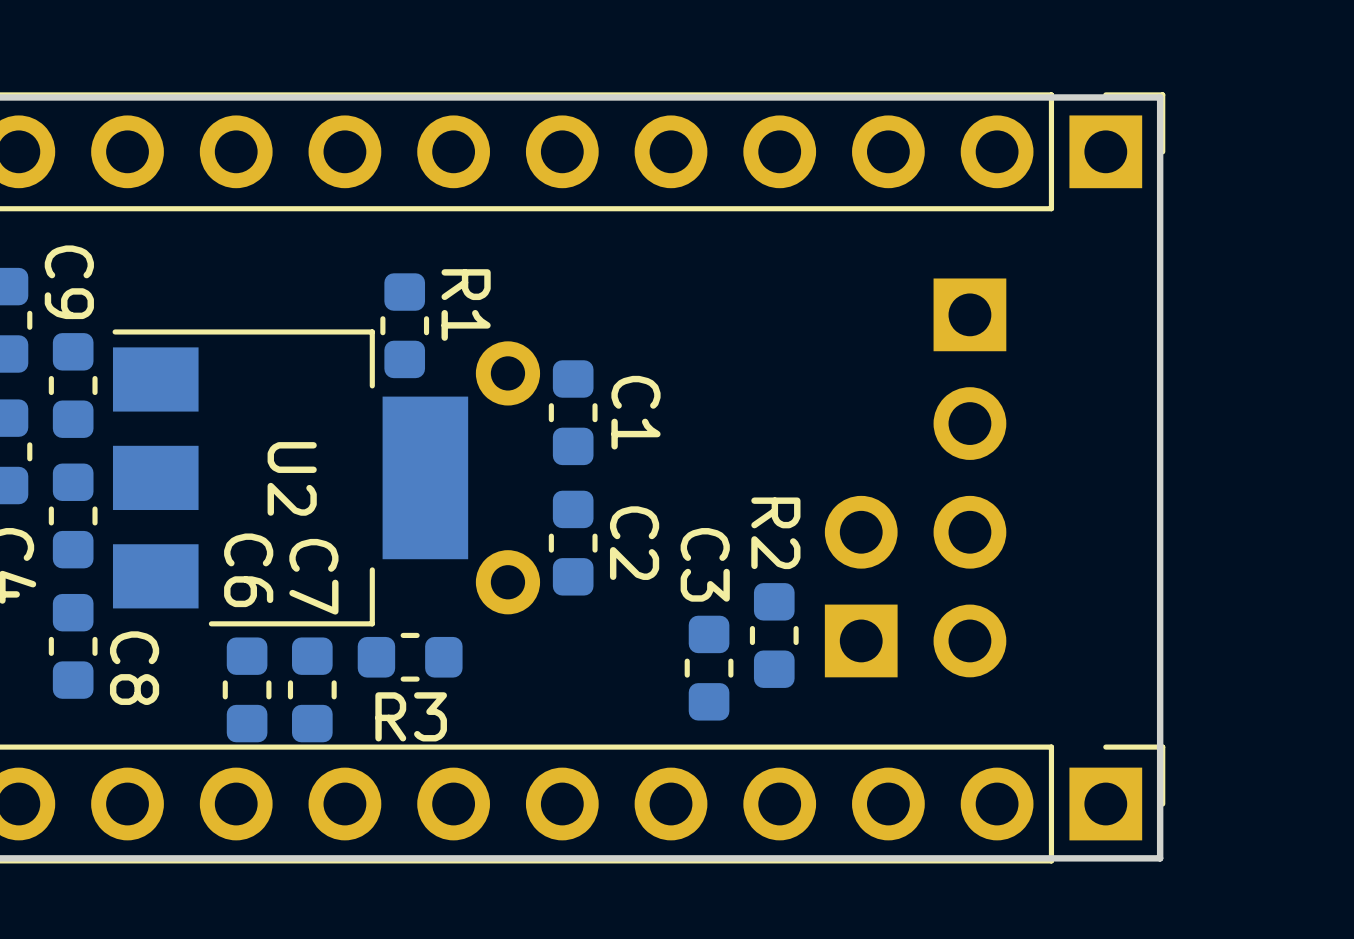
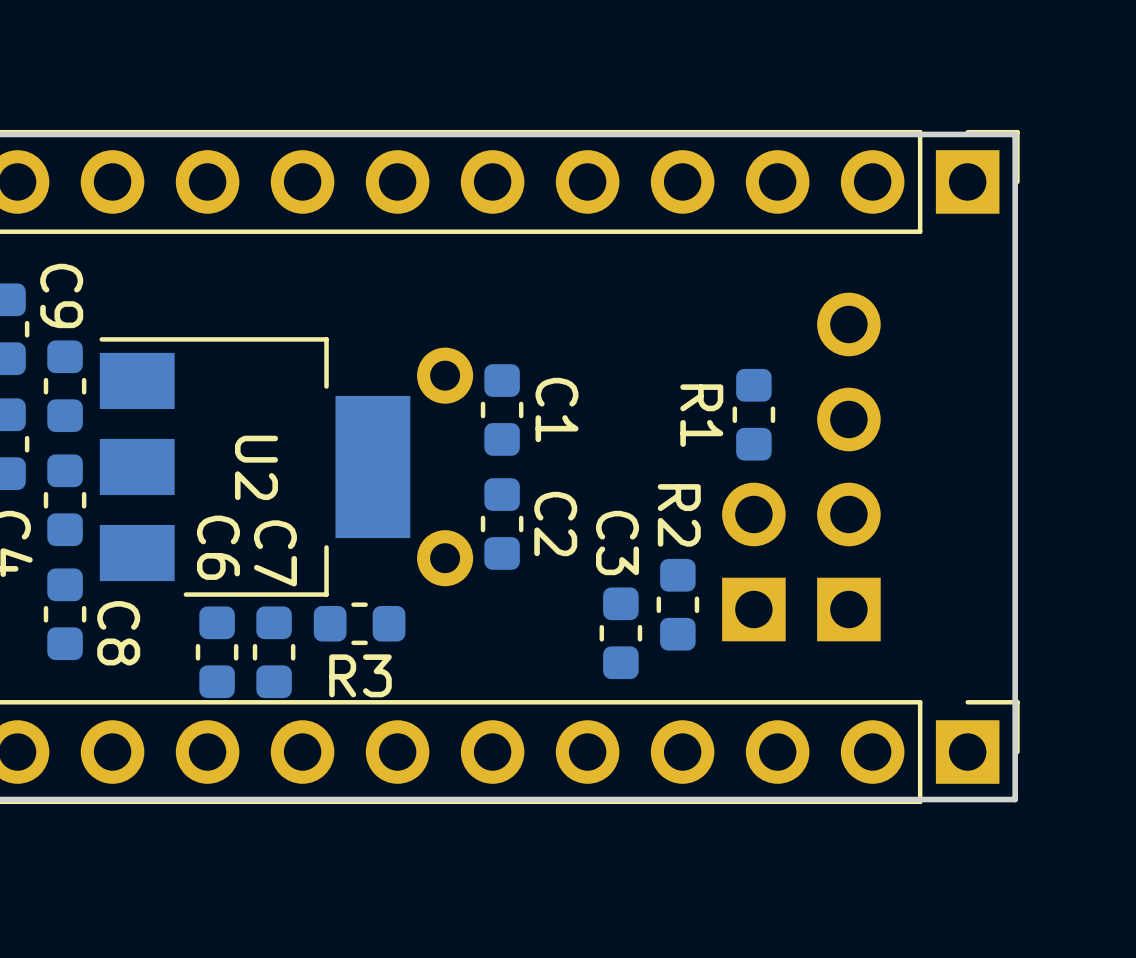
R1 name position: R1 (466, 305) -> R1 (701, 415)
R1 position: (404, 325) -> (753, 414)
part rotation: 0° (969, 477) -> 180° (848, 466)

